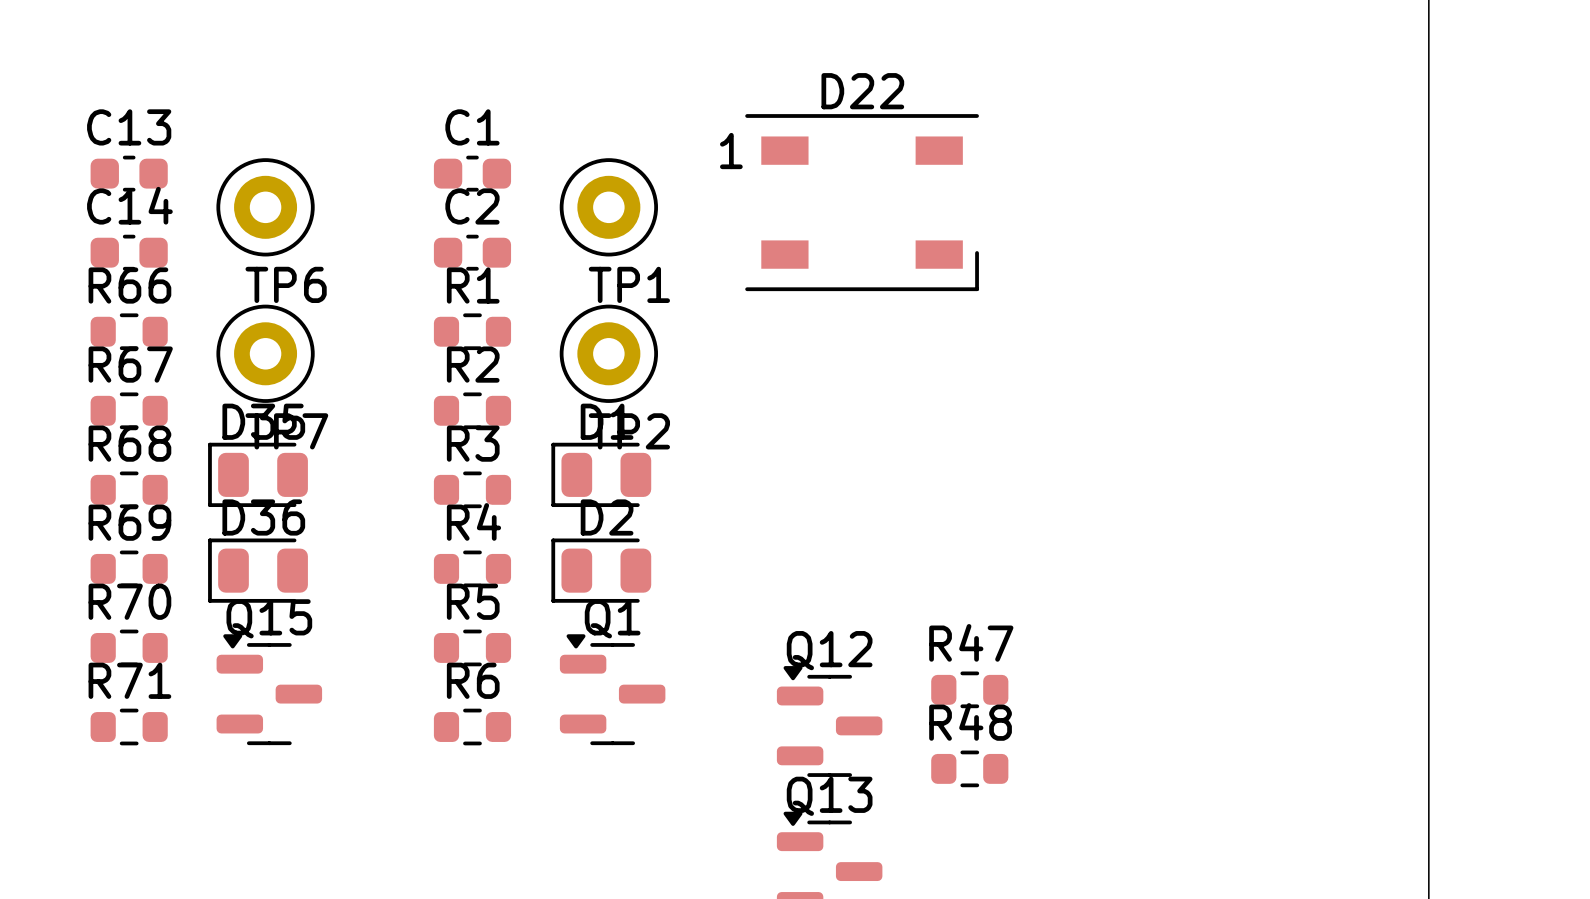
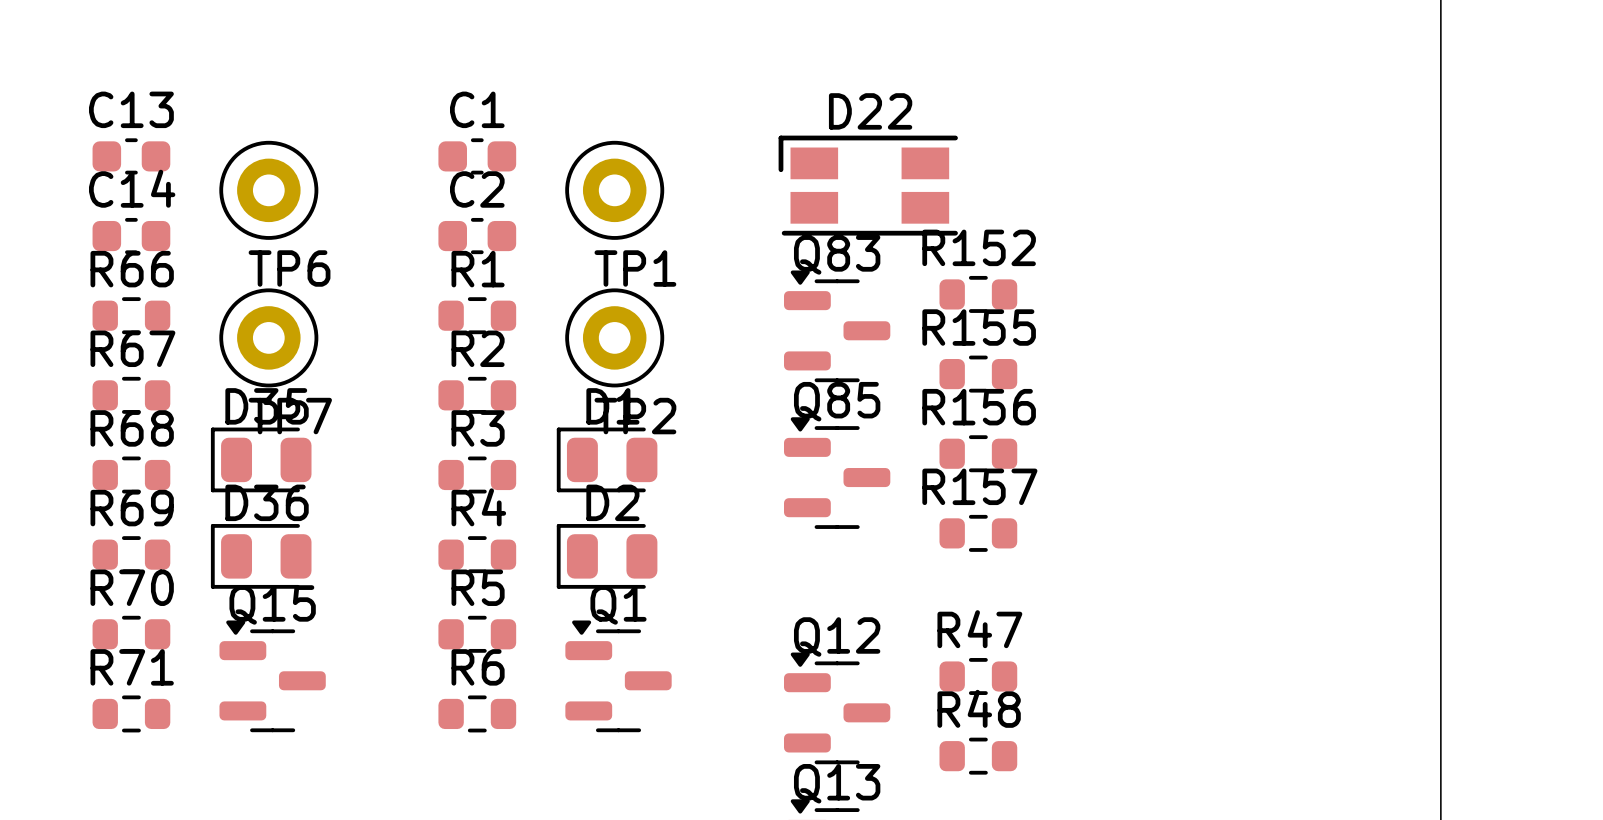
D22 footprint: [745, 114, 979, 292] -> [778, 135, 958, 236]
R152: none -> (978, 294)
Q83: none -> (837, 326)
R155: none -> (978, 374)
R156: none -> (978, 453)
Q85: none -> (837, 473)
R157: none -> (978, 533)

